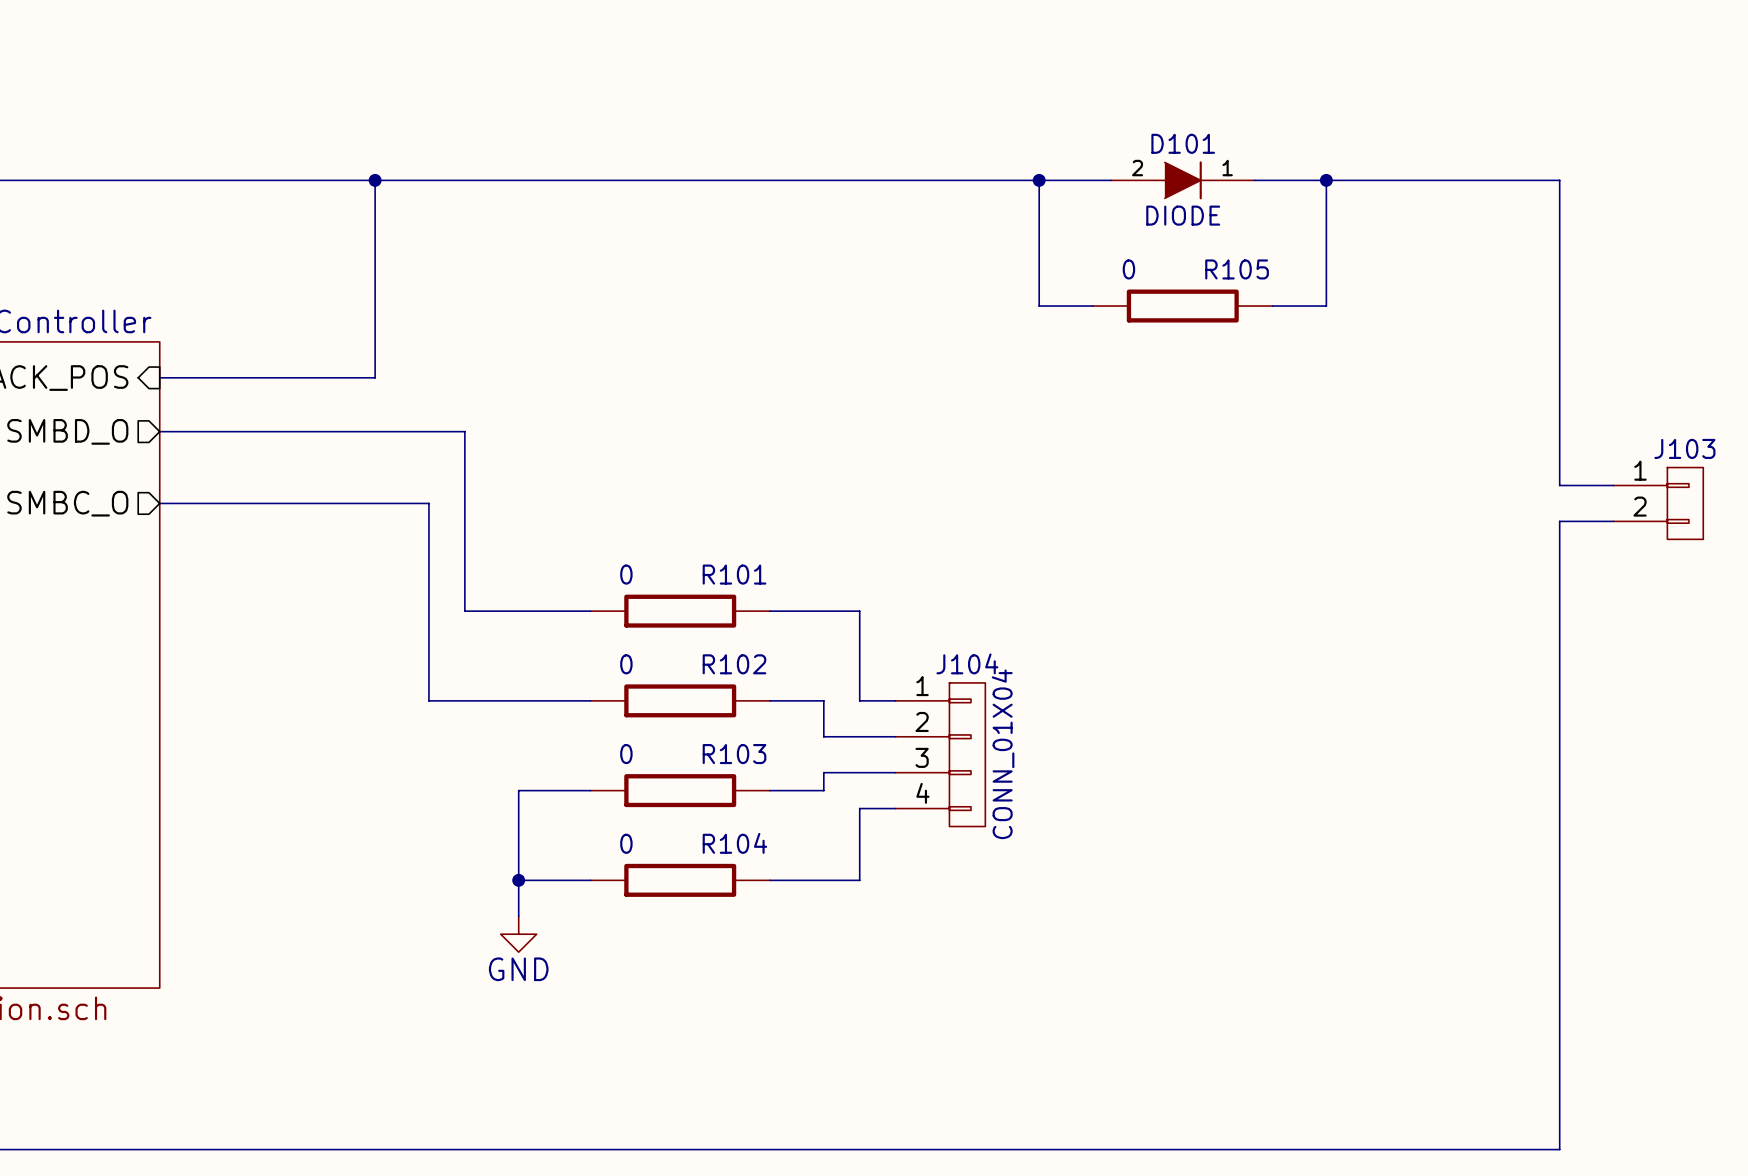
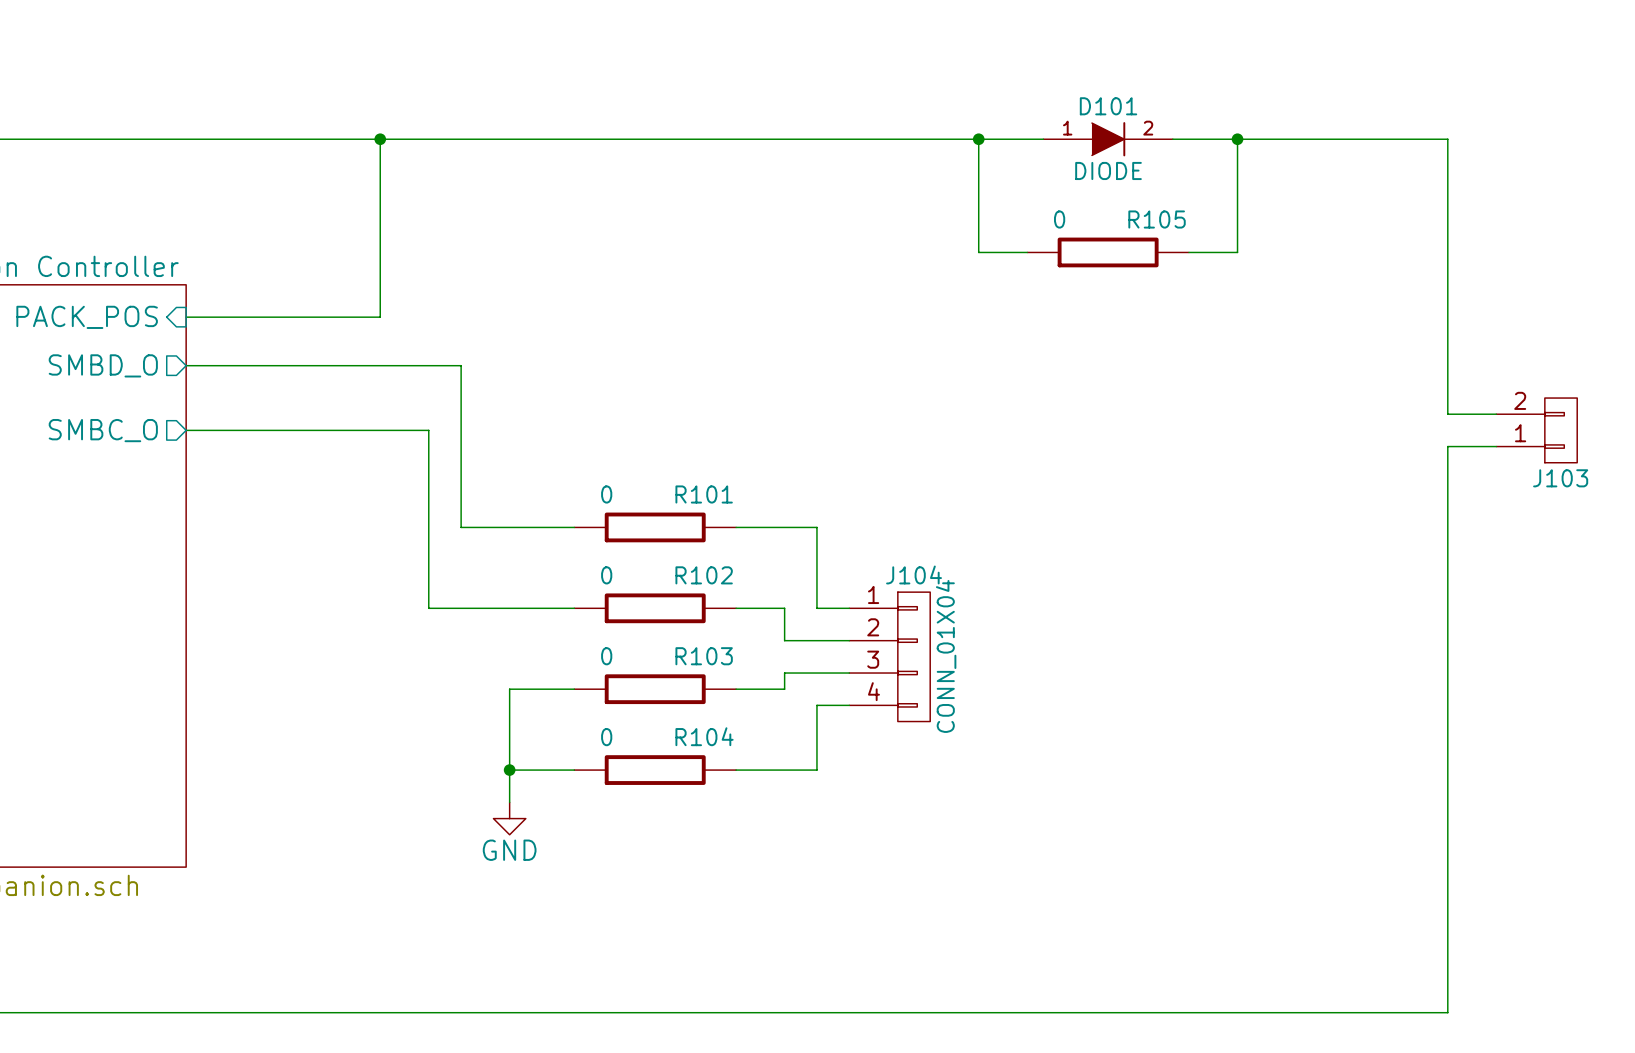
D101 pin number: 2 (1137, 168) -> 1 (1067, 128)
D101 pin number: 1 (1227, 168) -> 2 (1148, 128)
J103 flip: as is (1685, 503) -> up-down (1561, 430)

